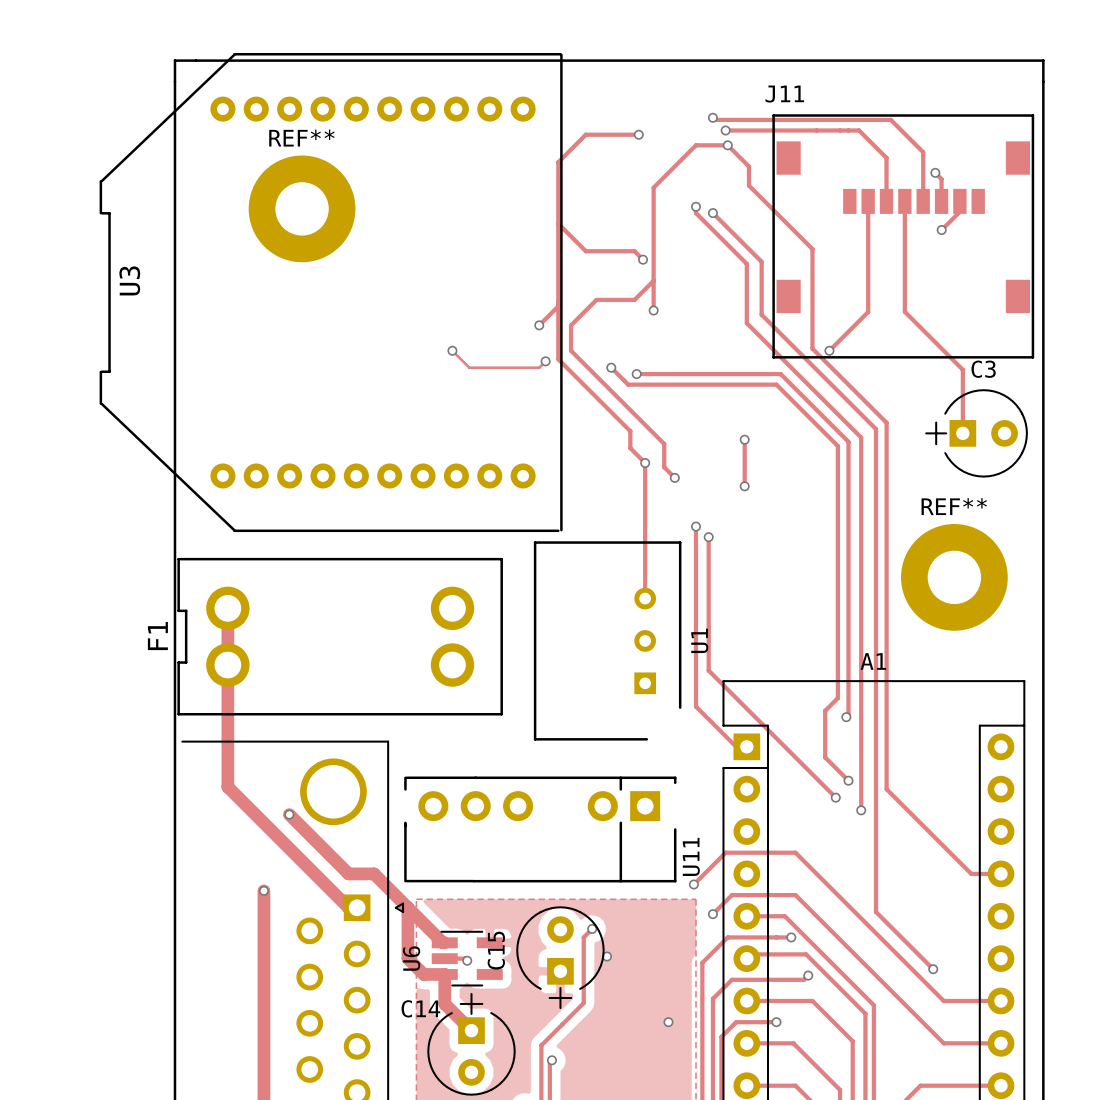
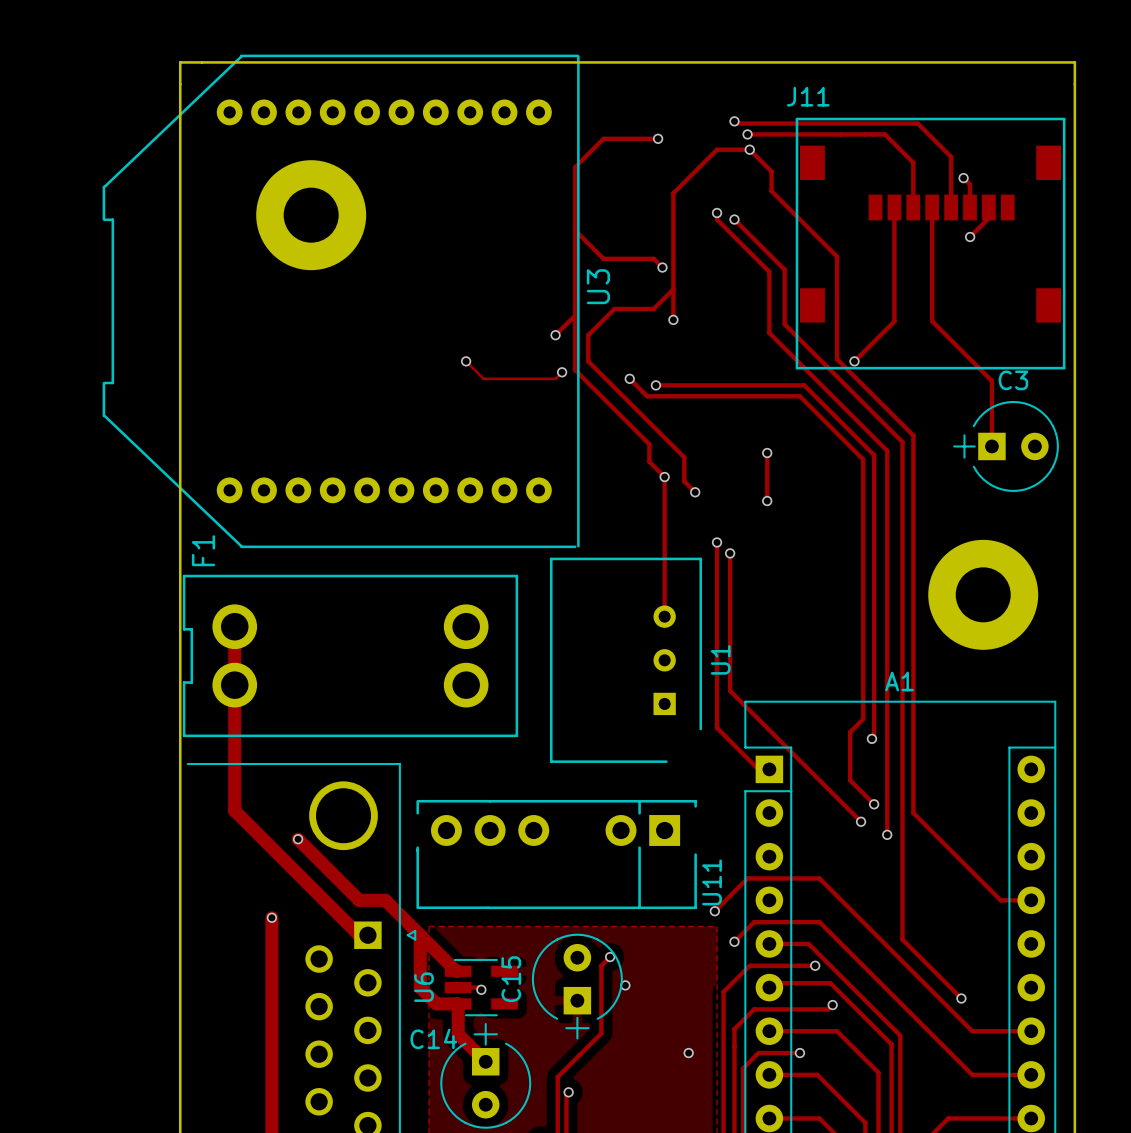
REF** name: REF** (301, 138) -> none
U3 name position: U3 (129, 280) -> U3 (598, 286)
REF** name: REF** (954, 506) -> none
F1 name position: F1 (157, 636) -> F1 (203, 550)

